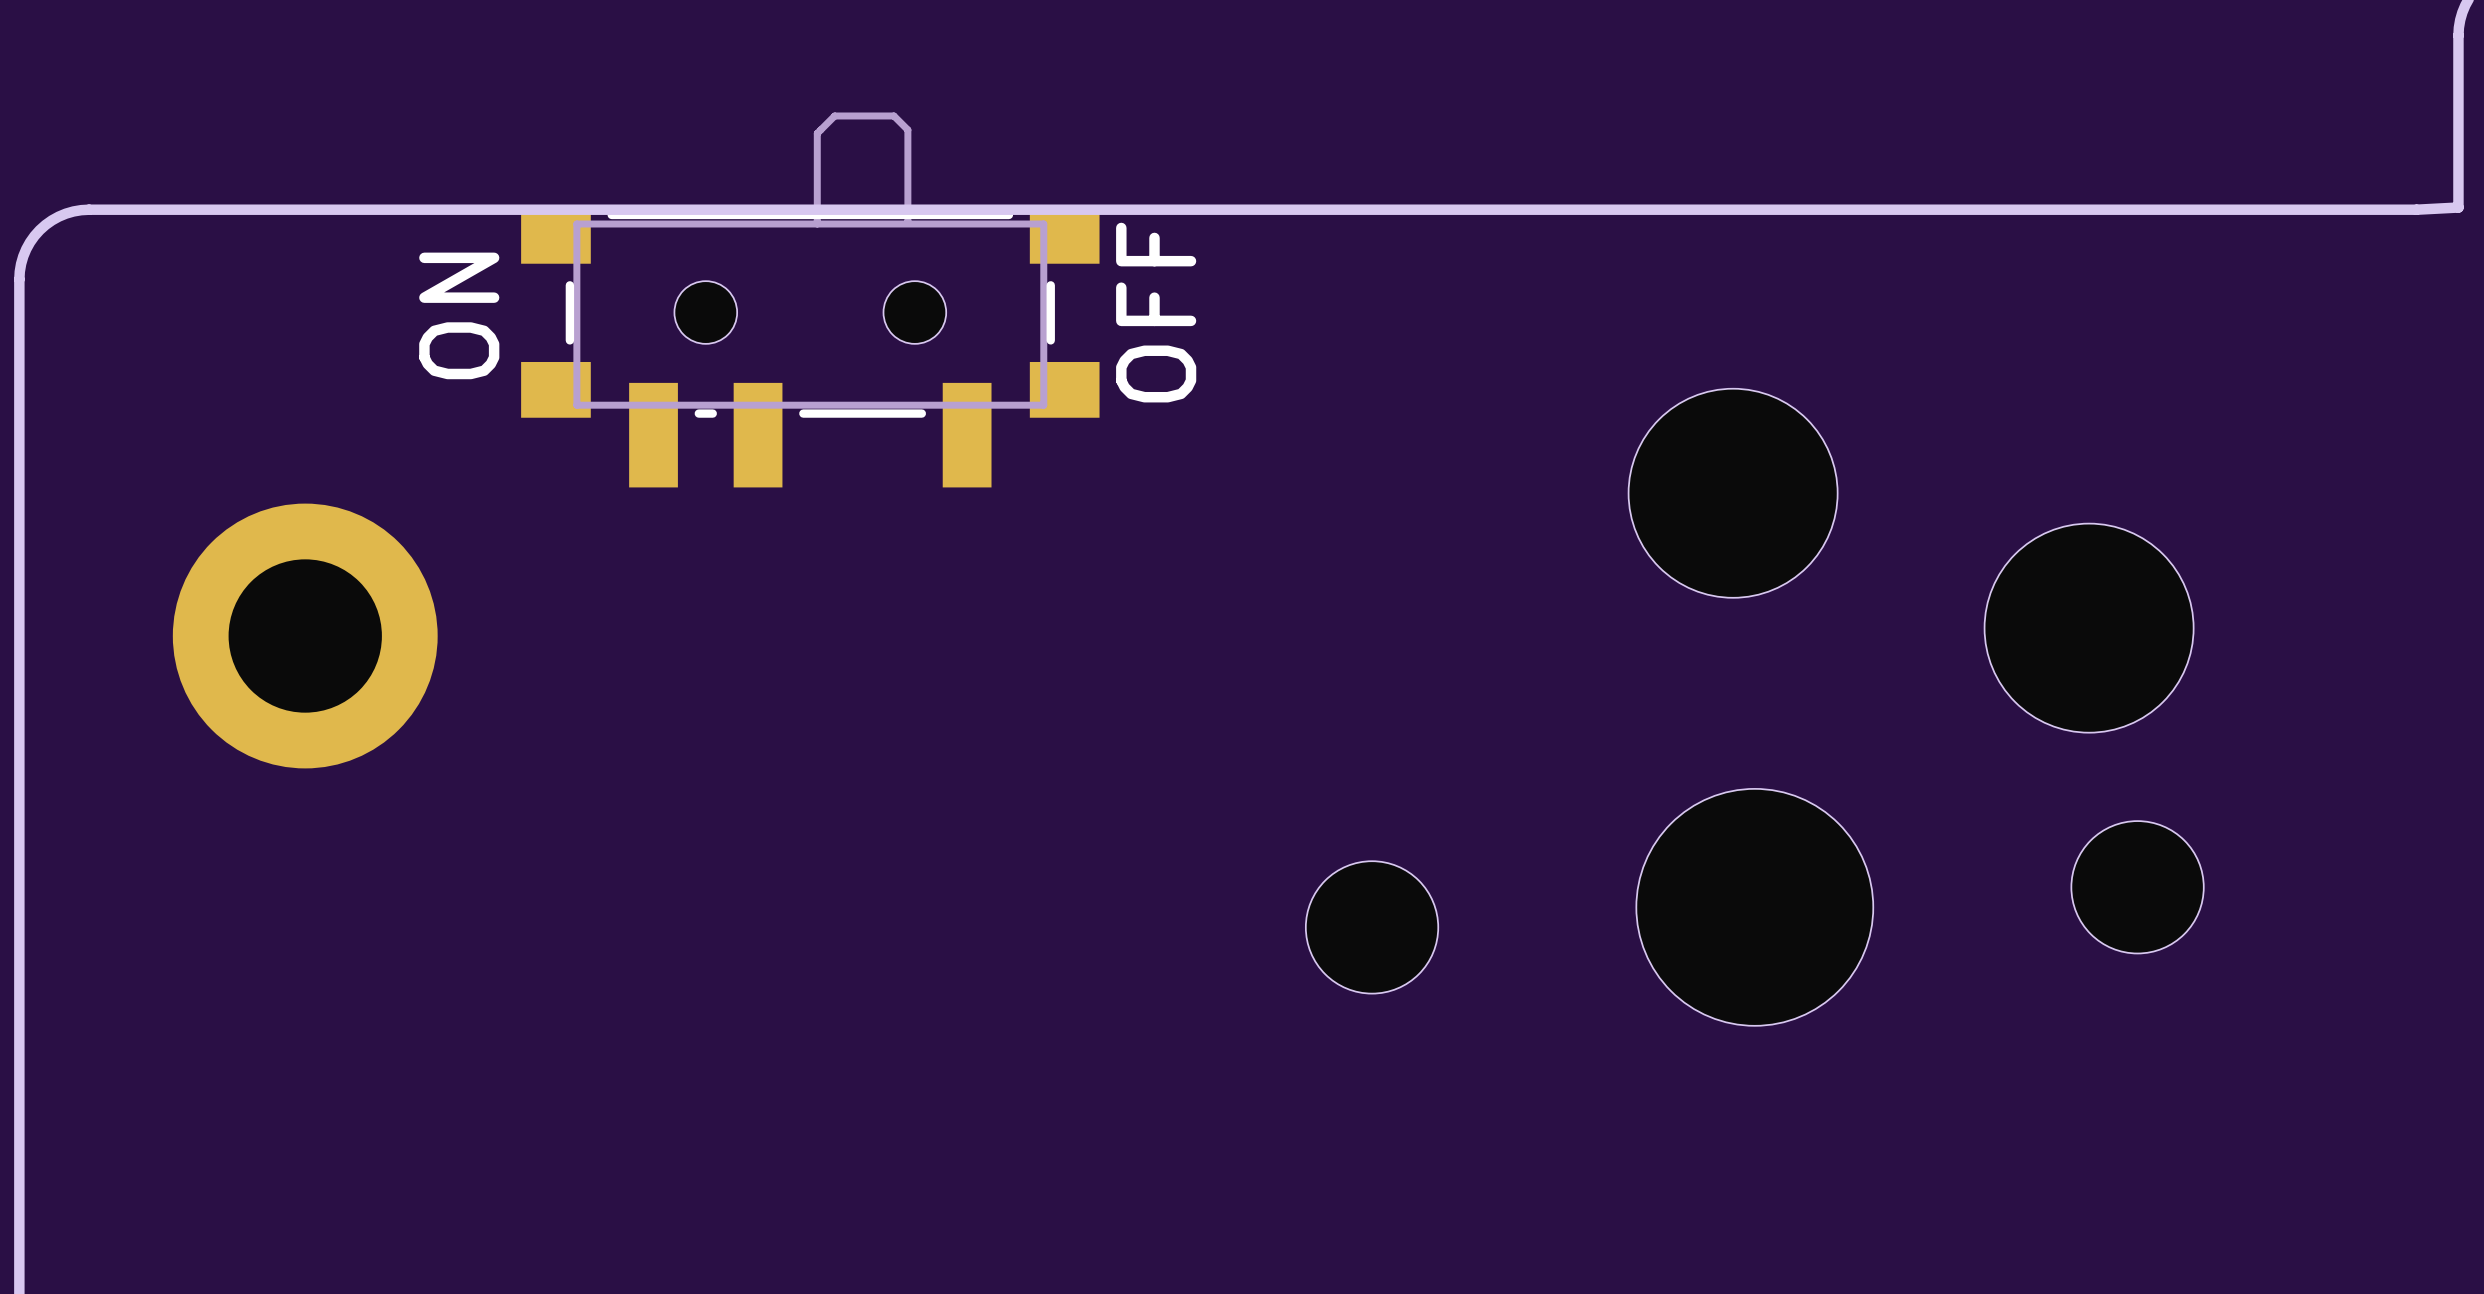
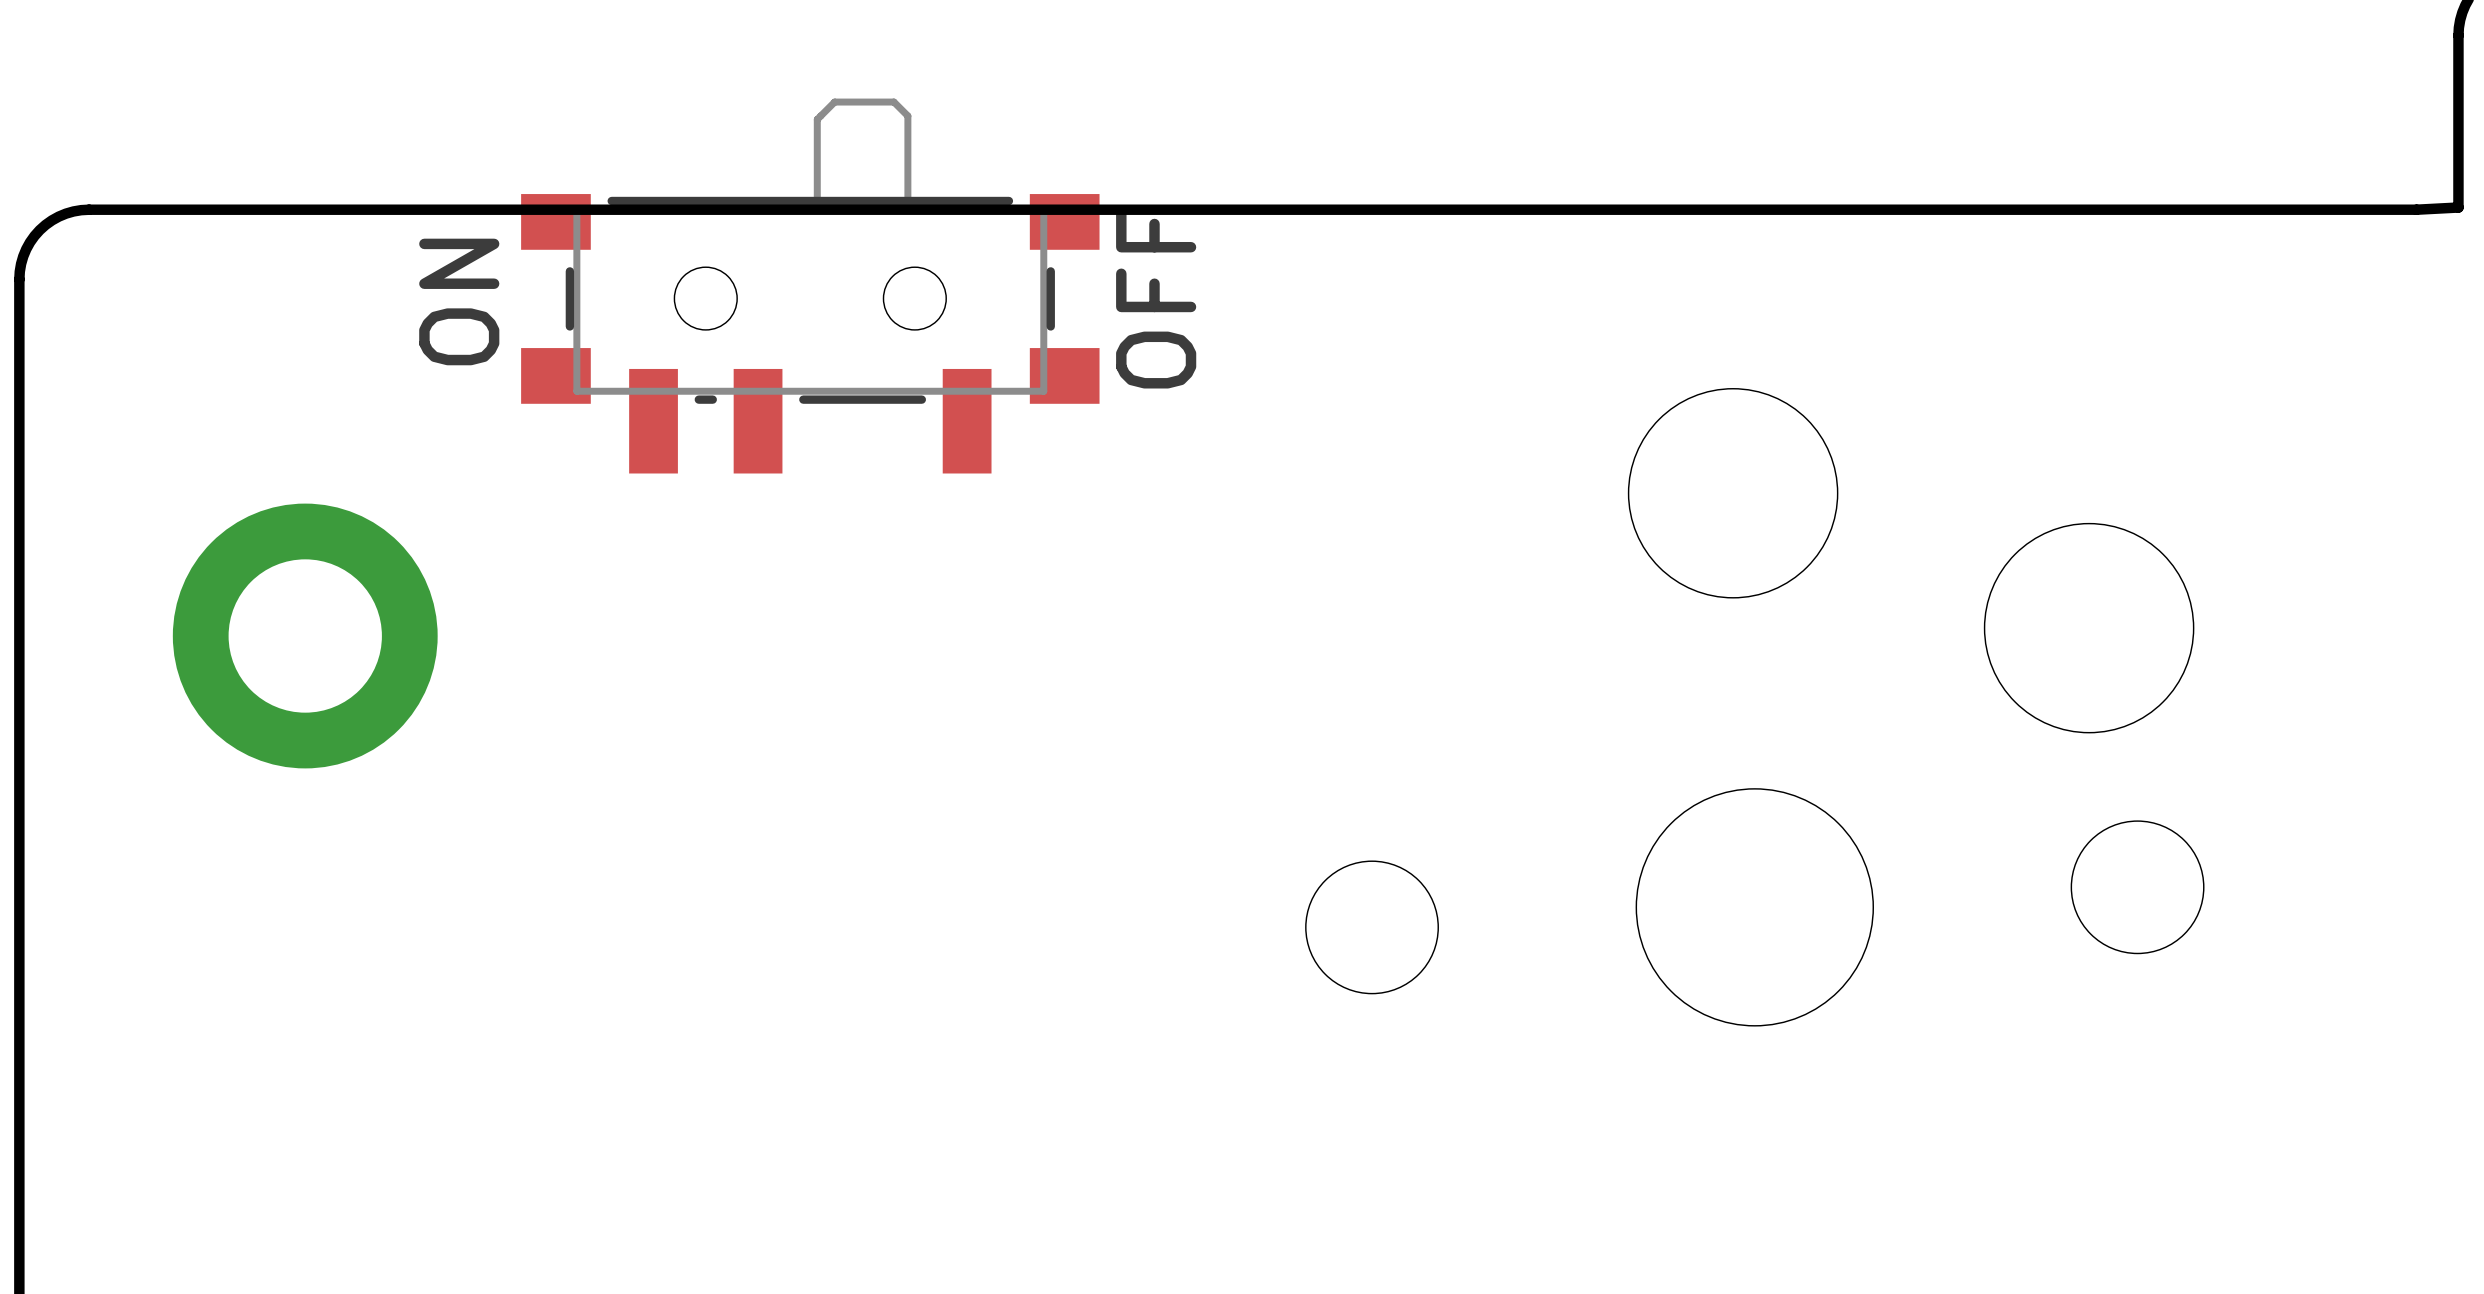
part position: (810, 299) -> (810, 286)

